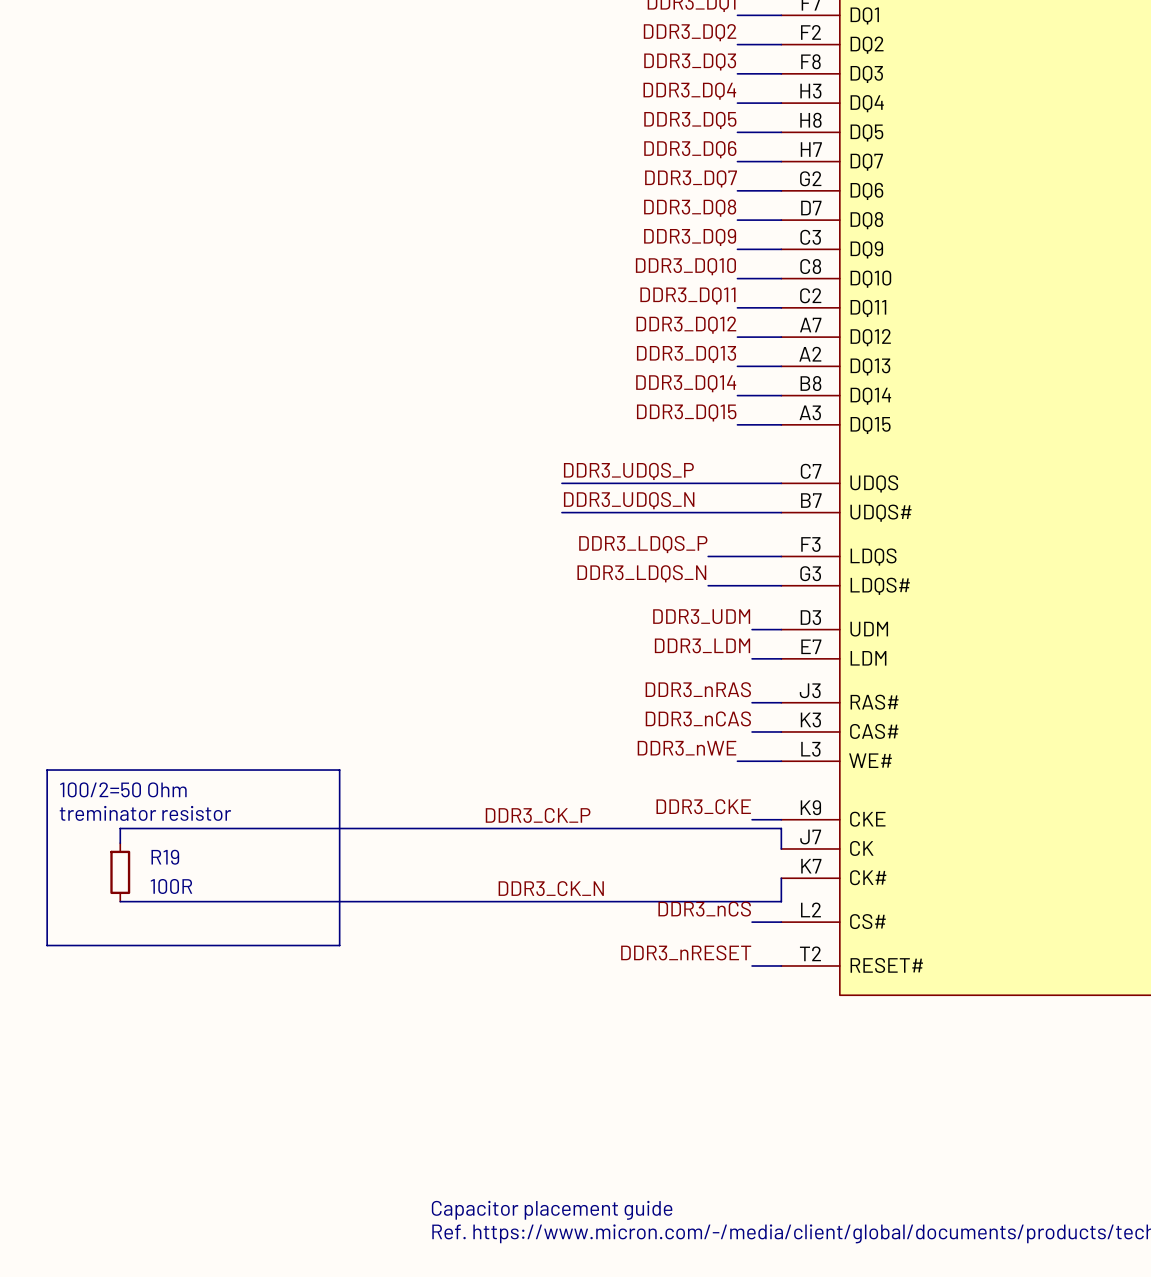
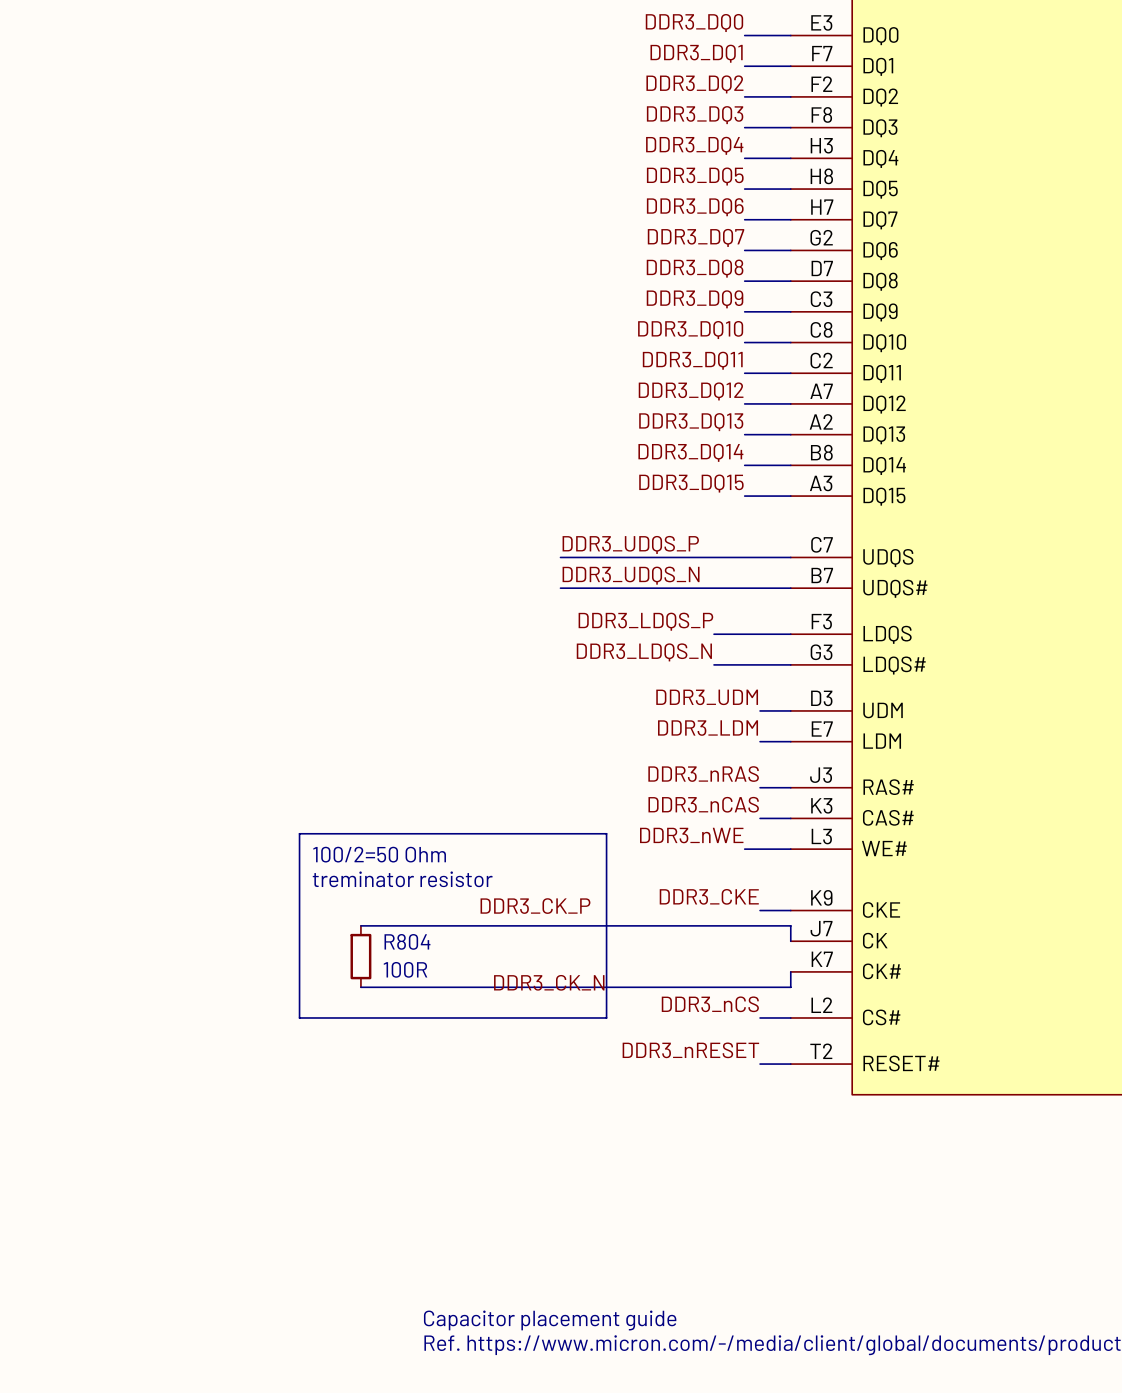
line: (47, 770) (339, 770) (339, 945) (47, 945) (47, 770) -> (299, 833) (606, 833) (606, 1017) (299, 1017) (299, 833)
text position: 100/2=50 Ohm (123, 789) -> 100/2=50 Ohm (379, 854)
text position: treminator resistor (145, 813) -> treminator resistor (402, 879)
wire: (781, 834) (781, 828) (120, 828) (120, 843) -> (790, 925) (360, 925)
R804: none -> 100R (360, 956)
R19: 100R (120, 872) -> none
wire: (781, 892) (781, 901) (120, 901) -> (790, 987) (360, 987)

